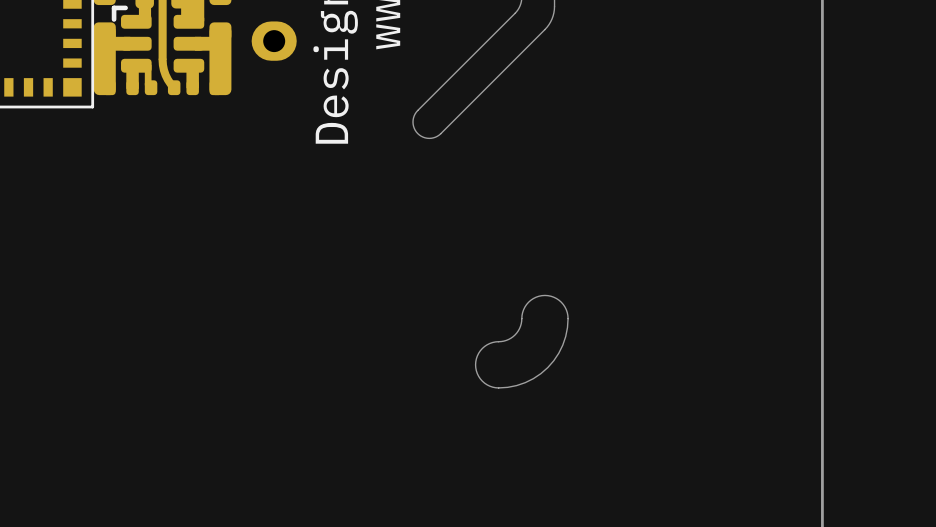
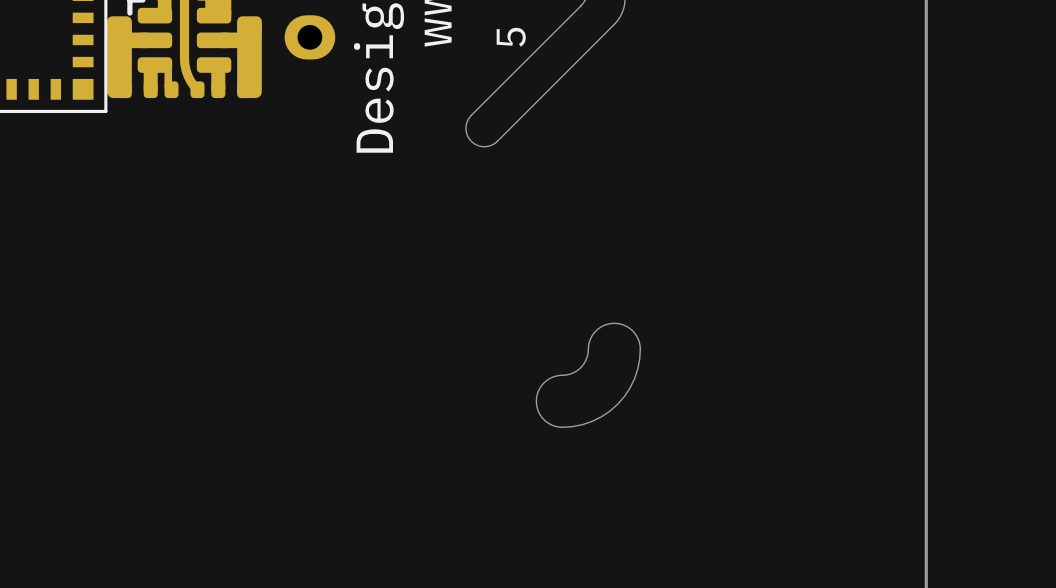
text: none -> 5 (511, 37)

